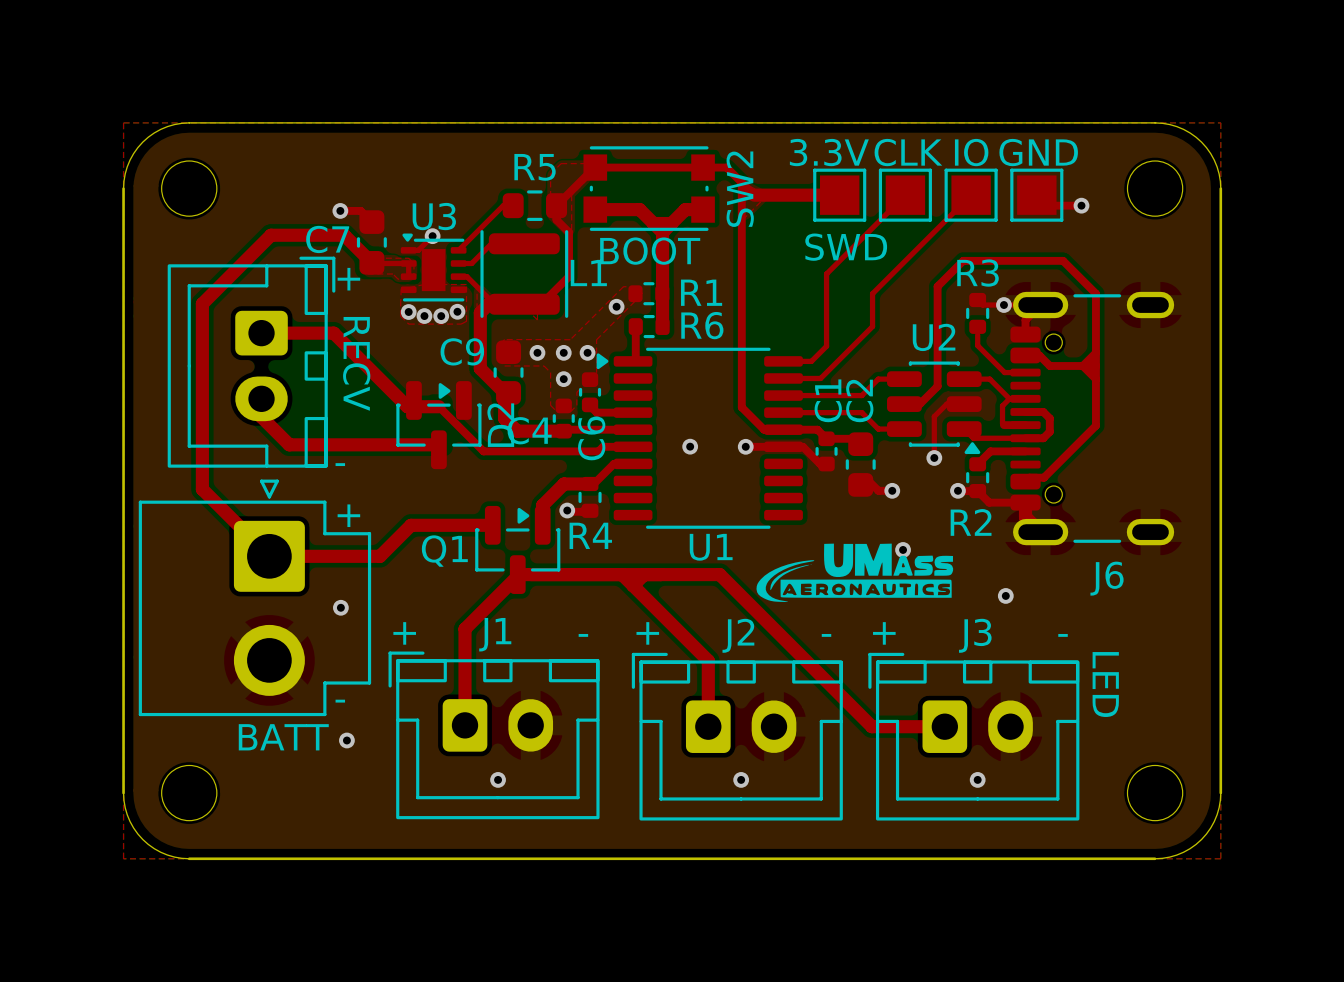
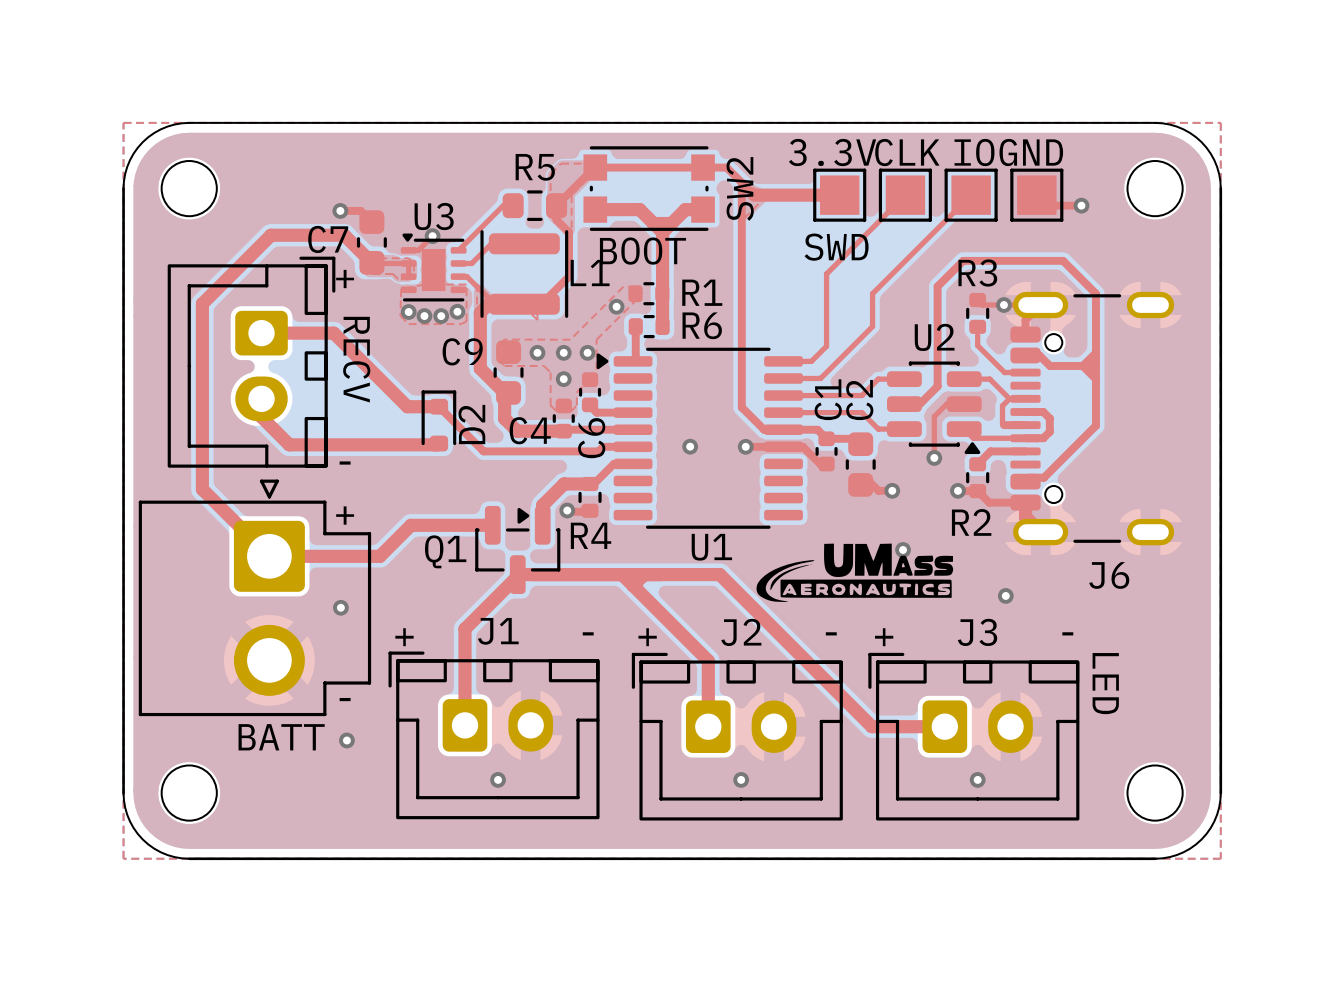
D2 footprint: [396, 381, 482, 470] -> [421, 390, 457, 452]

